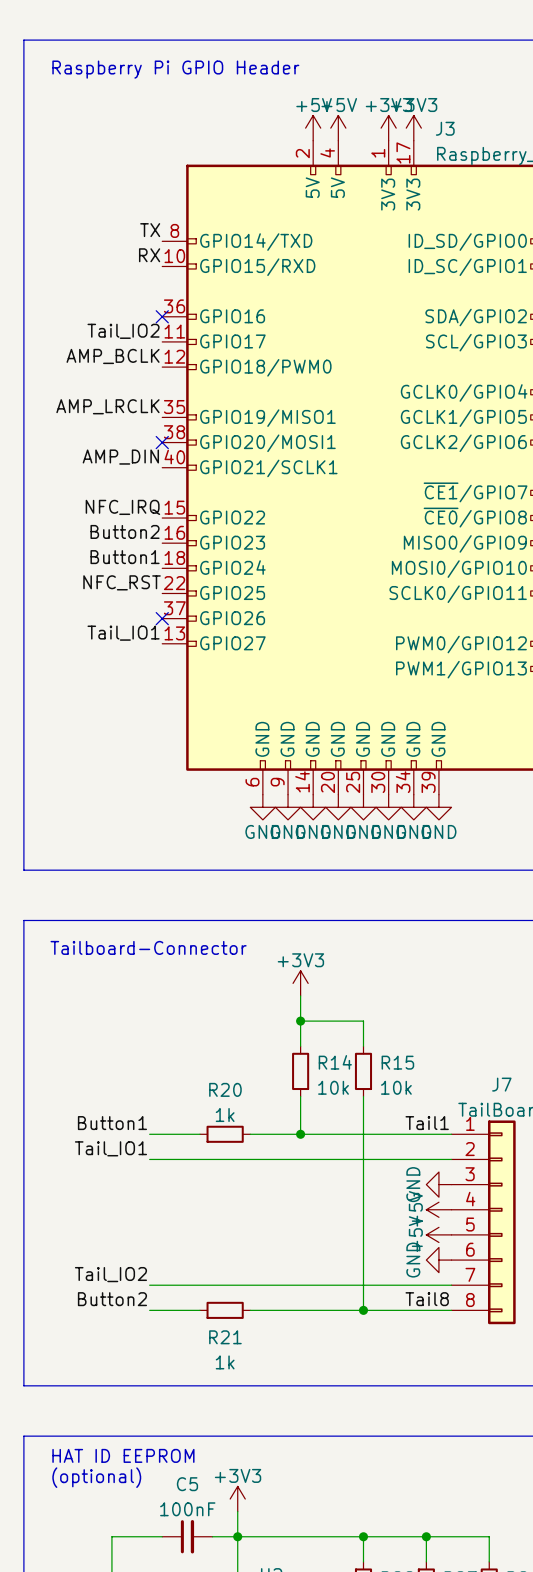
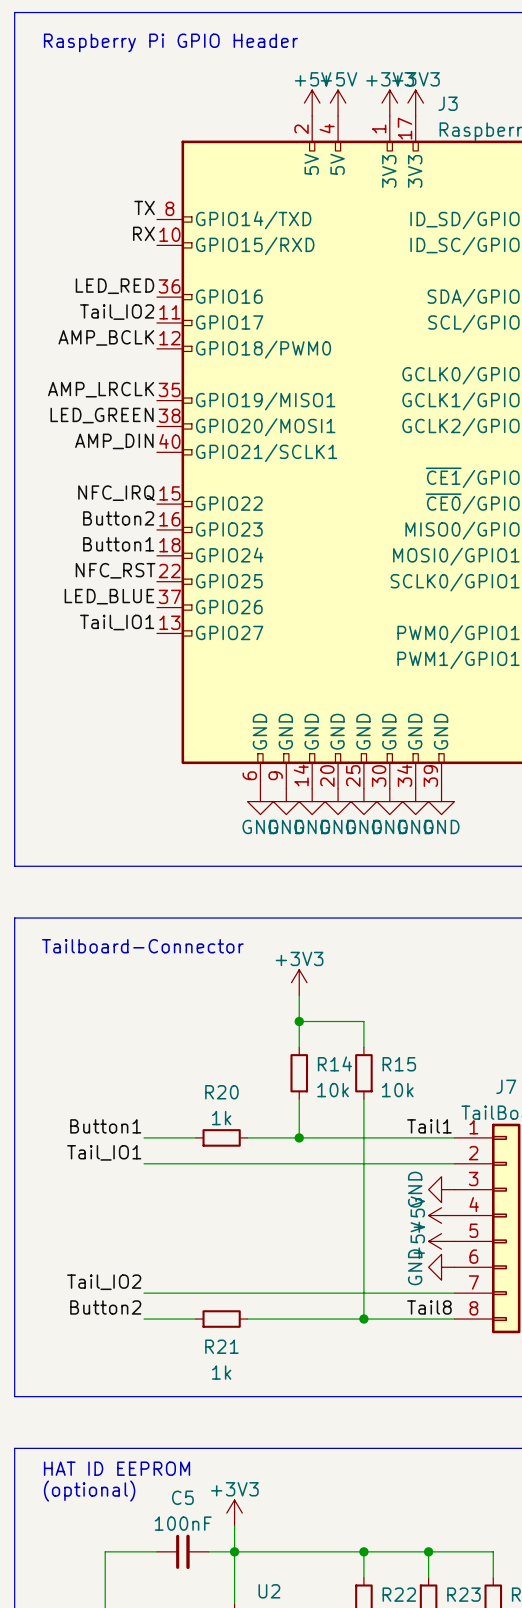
label: none -> LED_RED (114, 286)
no-connect mark: (162, 316) -> none
label: none -> LED_GREEN (102, 415)
no-connect mark: (162, 442) -> none
label: none -> LED_BLUE (109, 596)
no-connect mark: (162, 618) -> none

